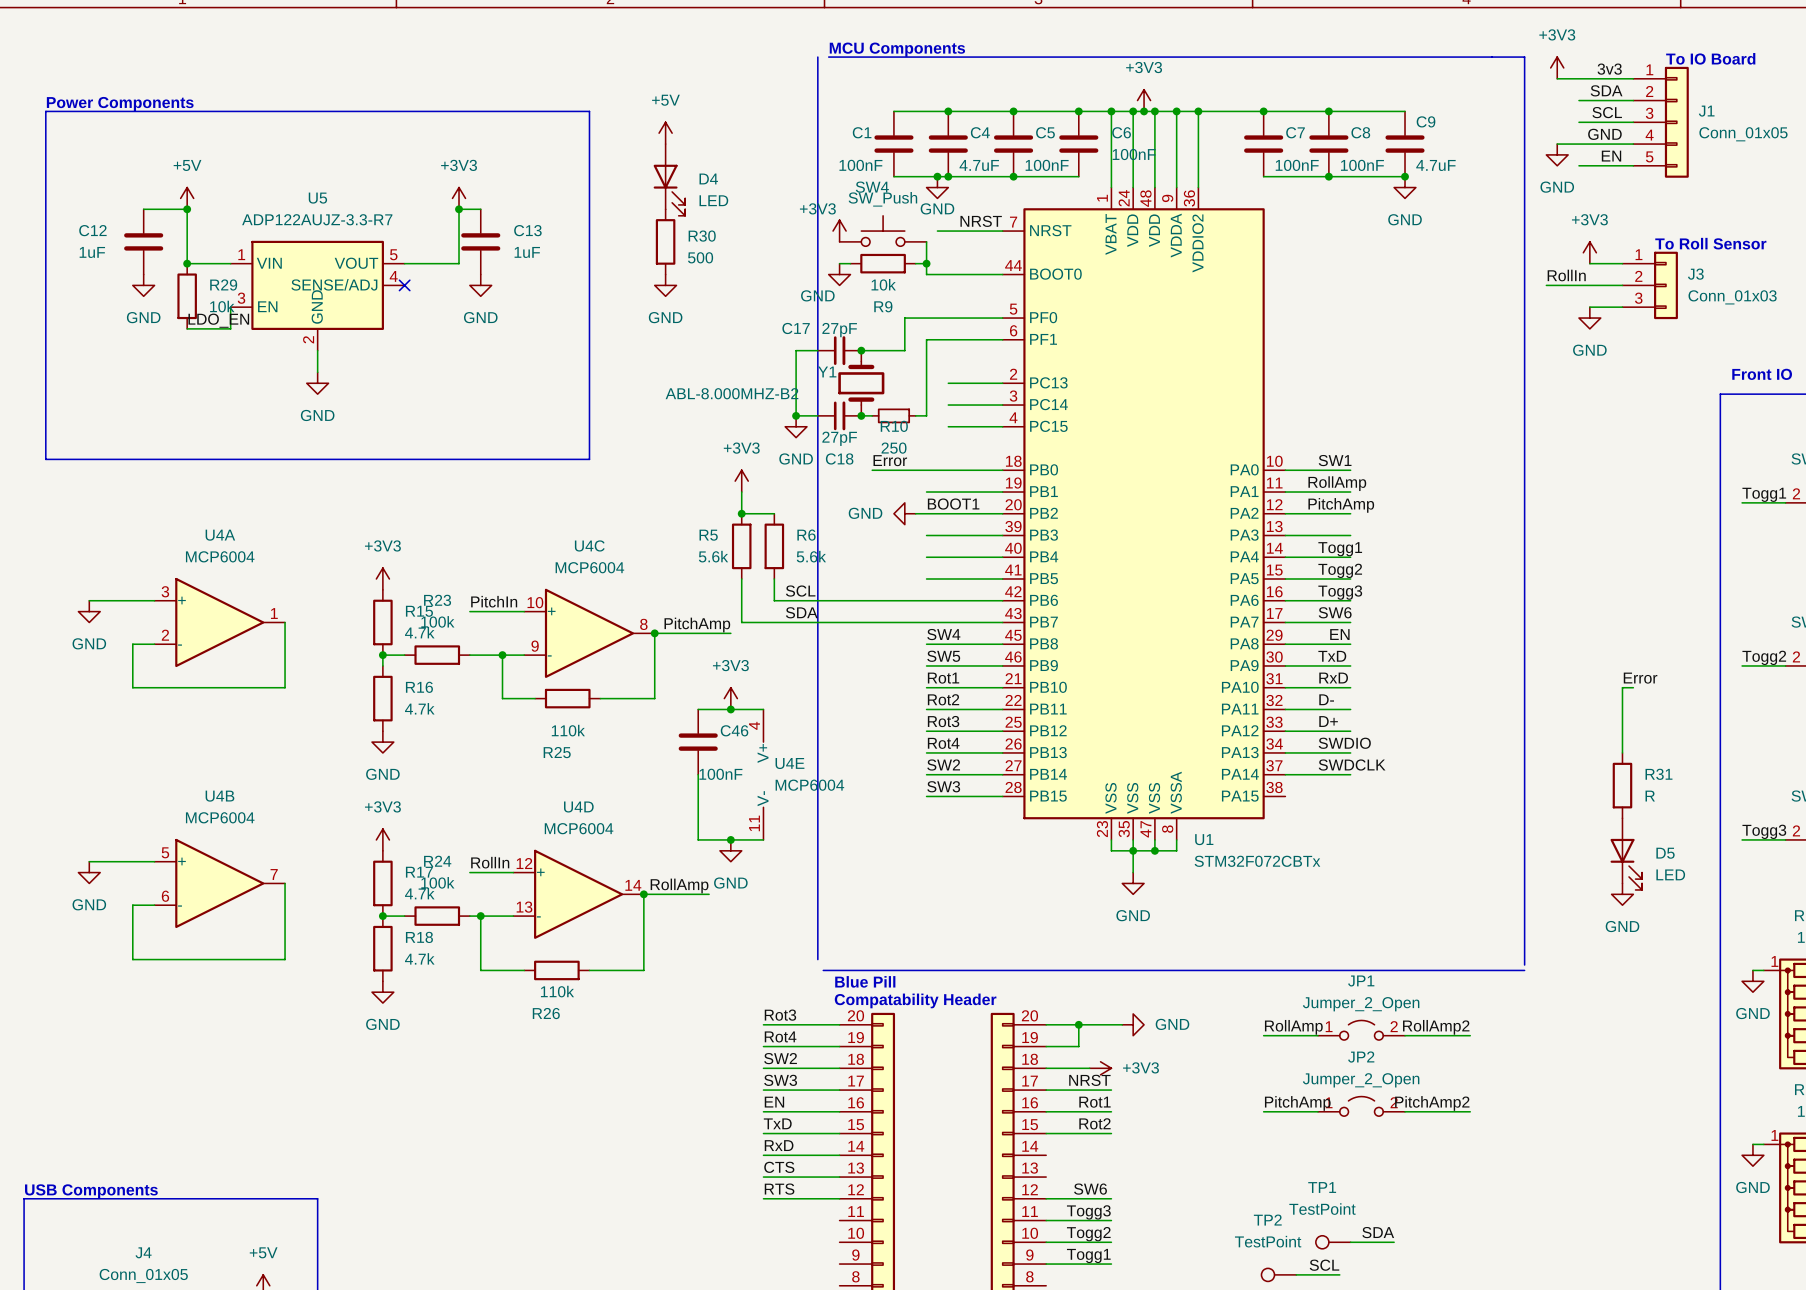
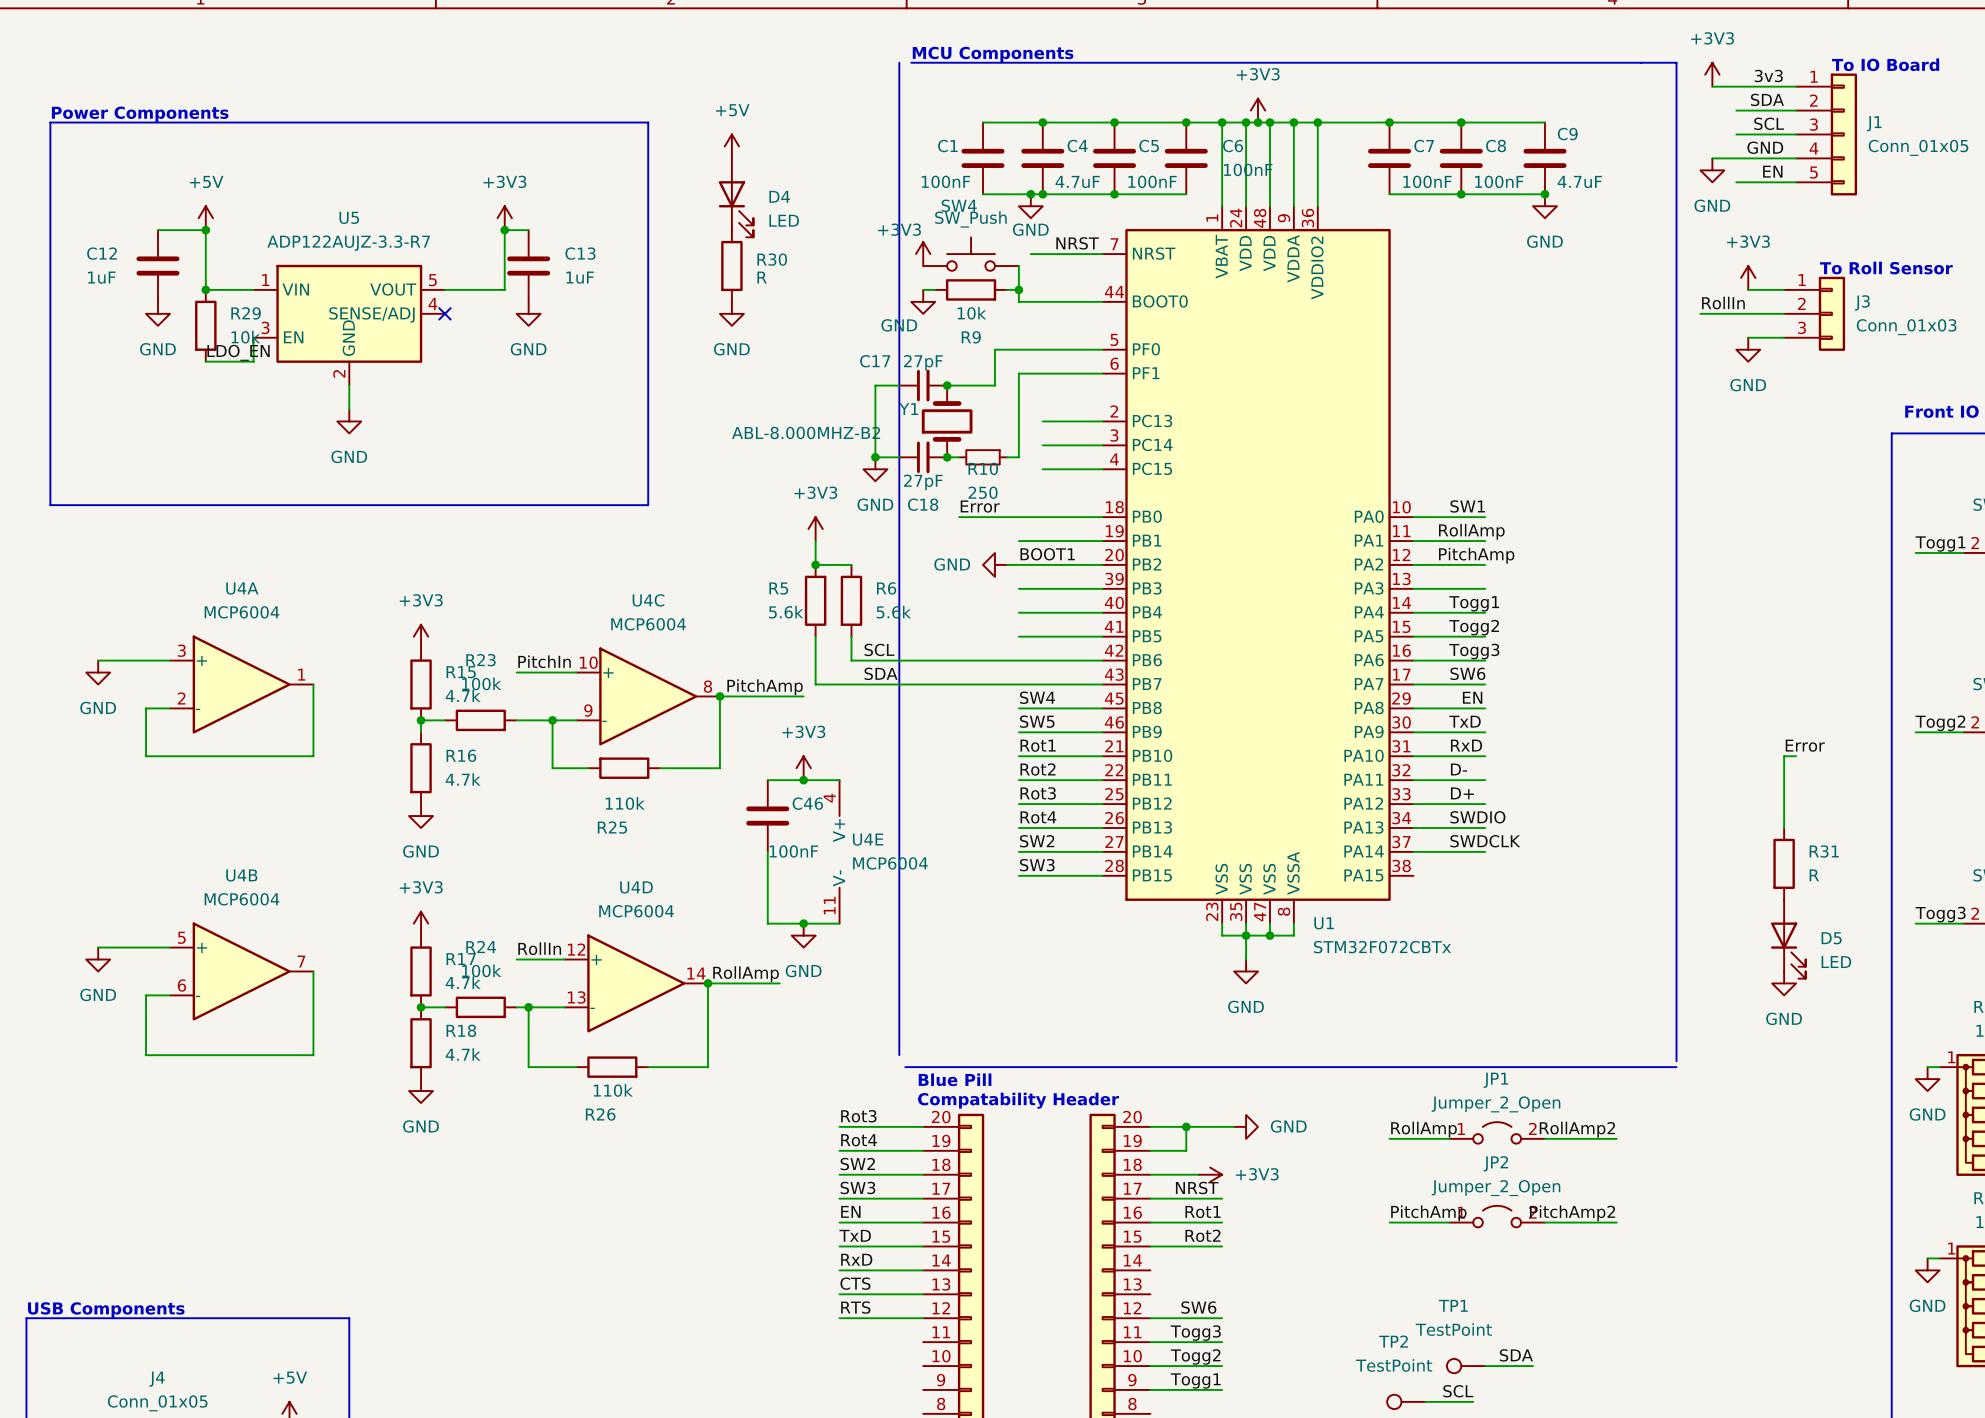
R30 value: 500 (700, 257) -> R (762, 277)

